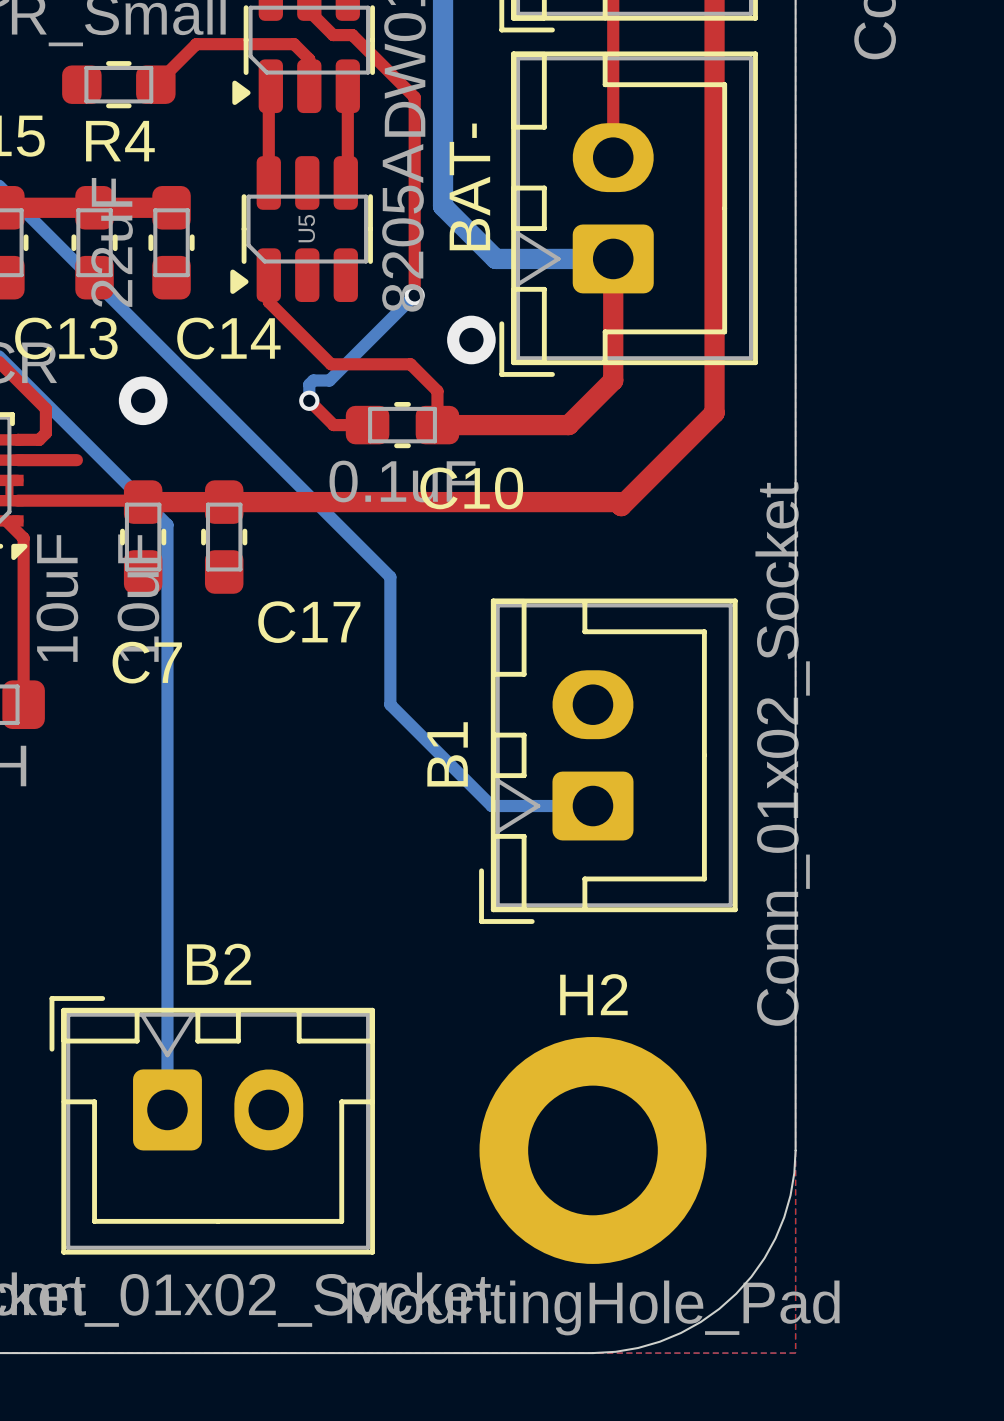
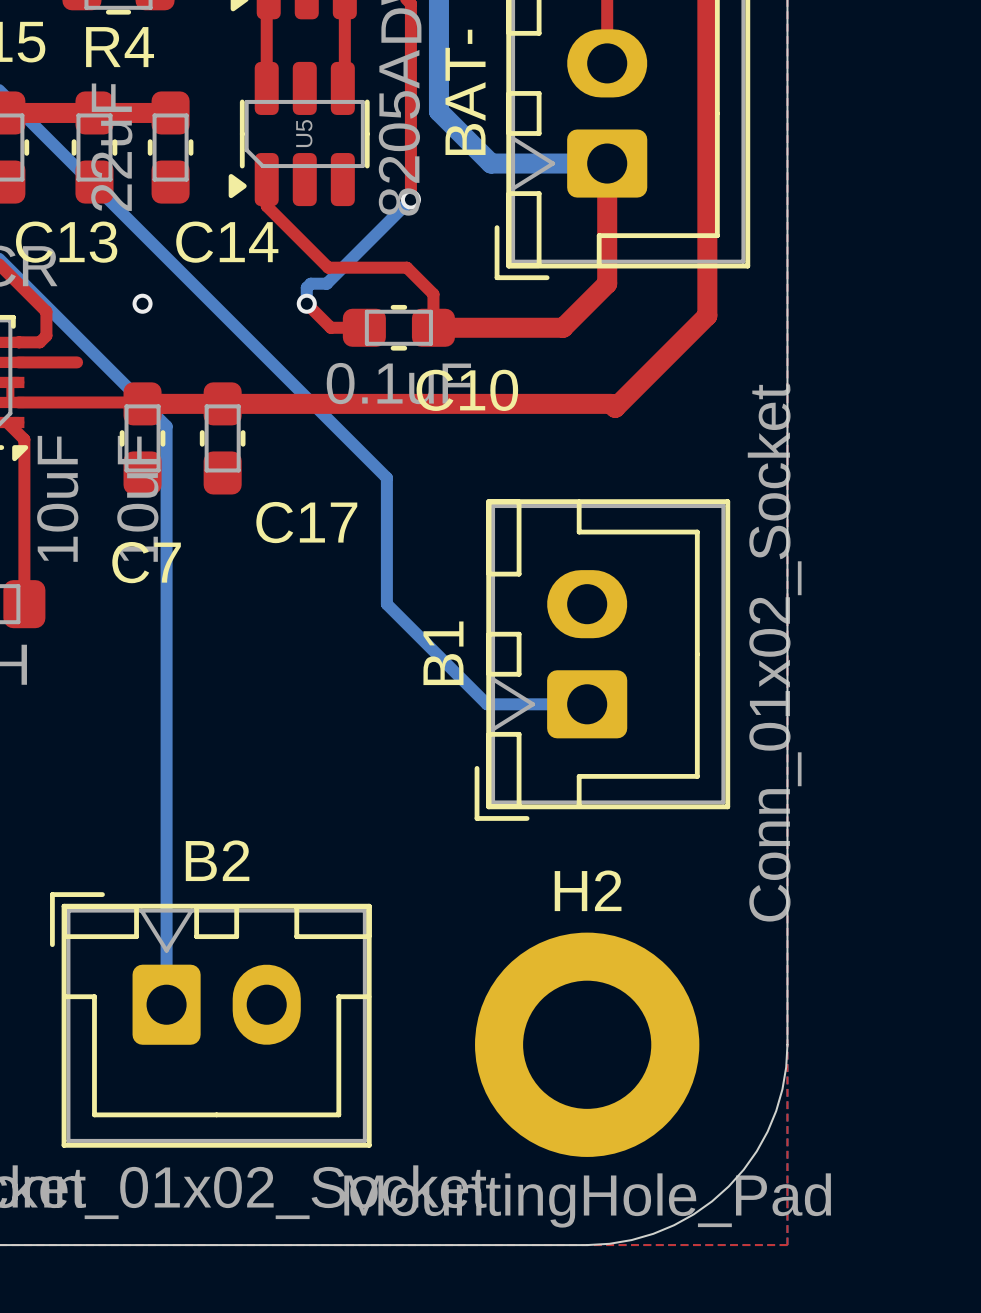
via: (471, 339) -> none
via size: [118, 376, 168, 426] -> [132, 293, 153, 314]

